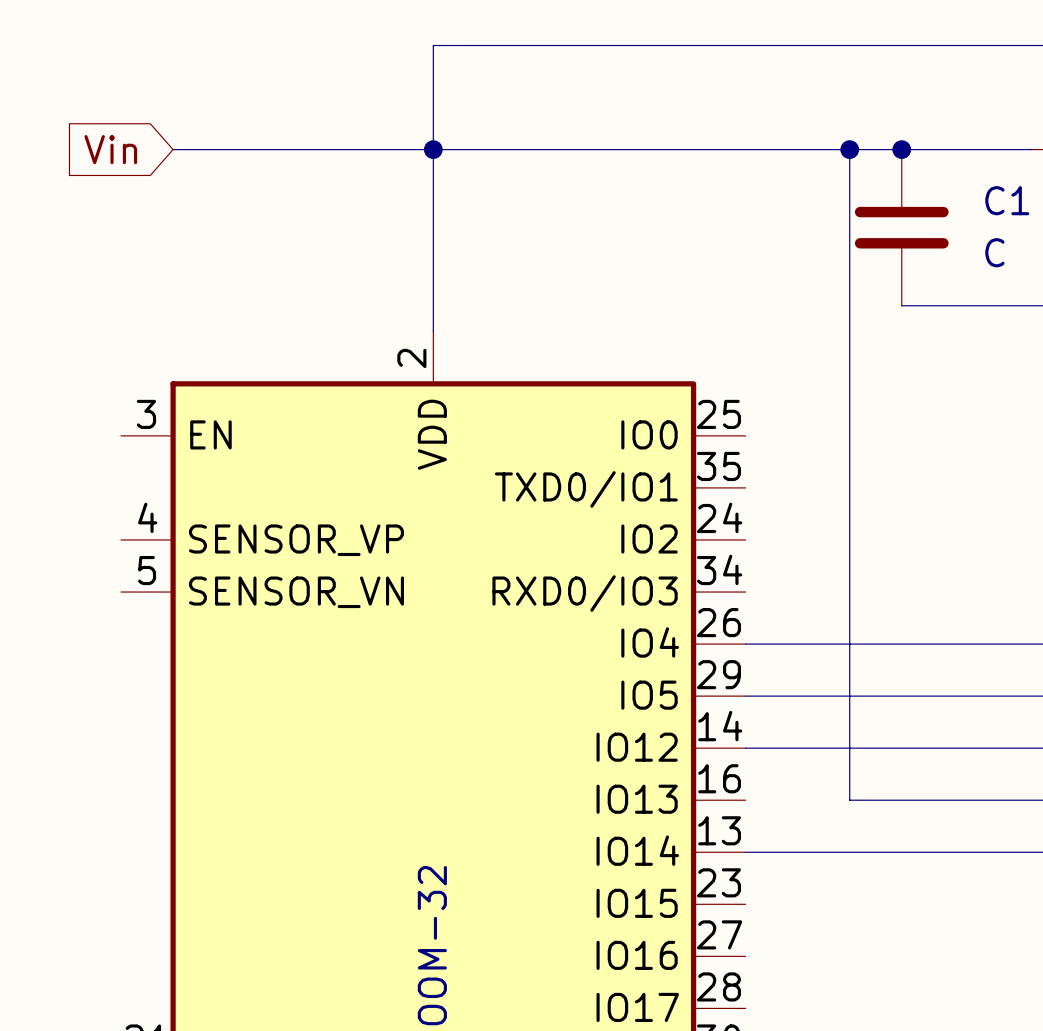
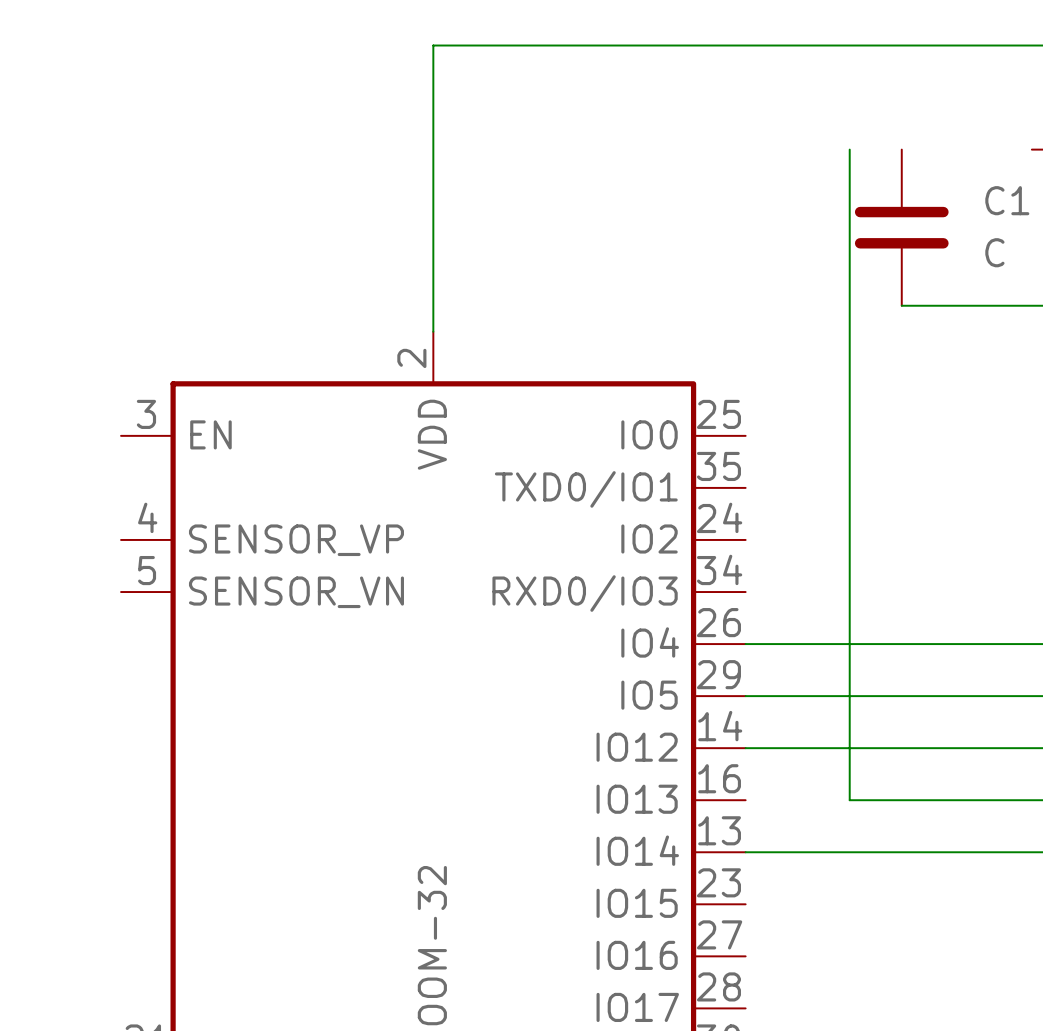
global label: Vin (110, 149) -> none
wire: (173, 149) (1031, 149) -> none
junction: (433, 149) -> none
junction: (849, 149) -> none
junction: (901, 149) -> none

